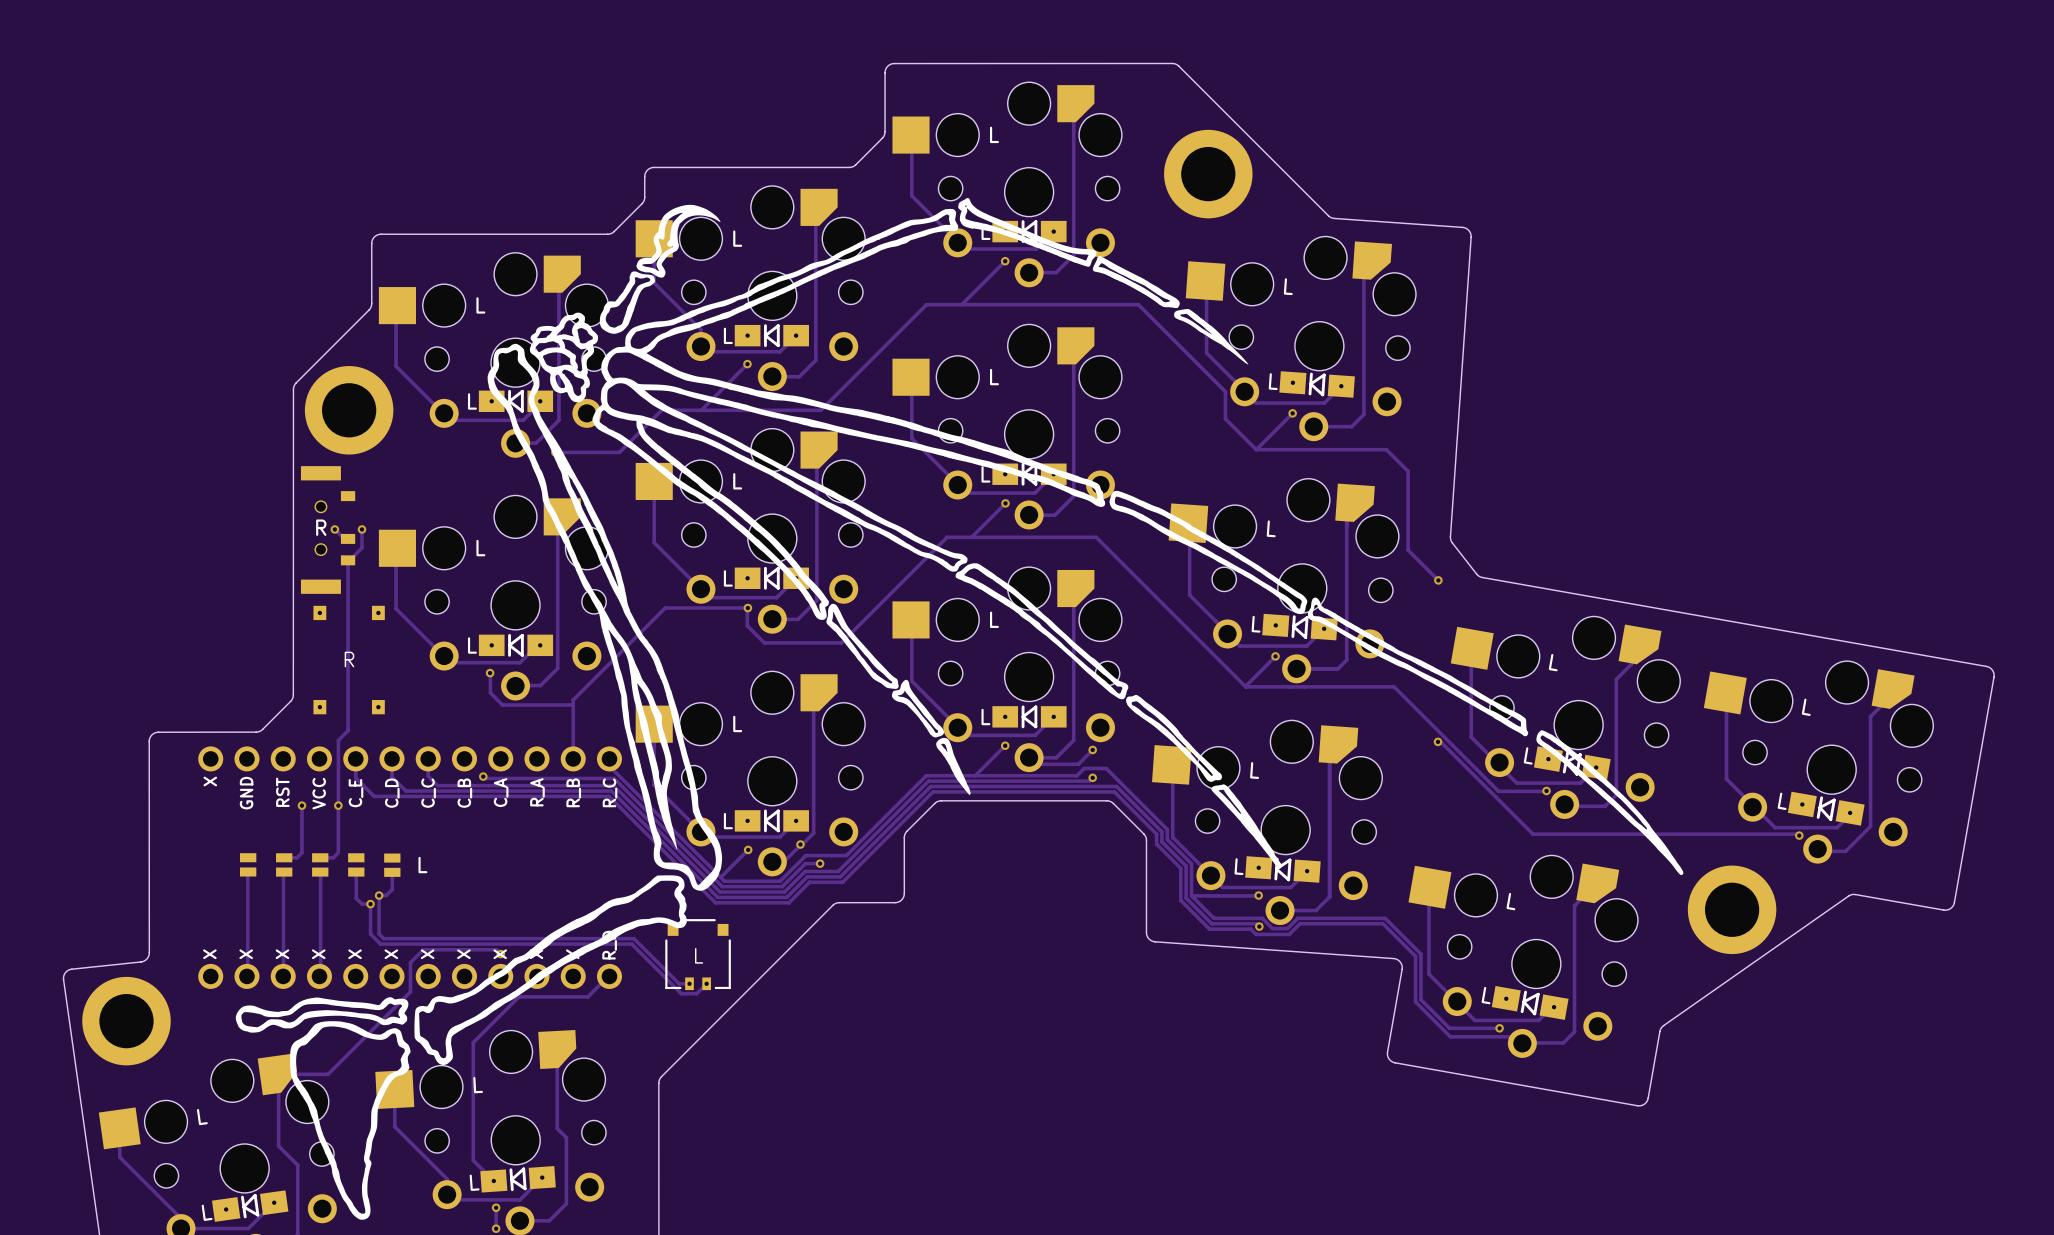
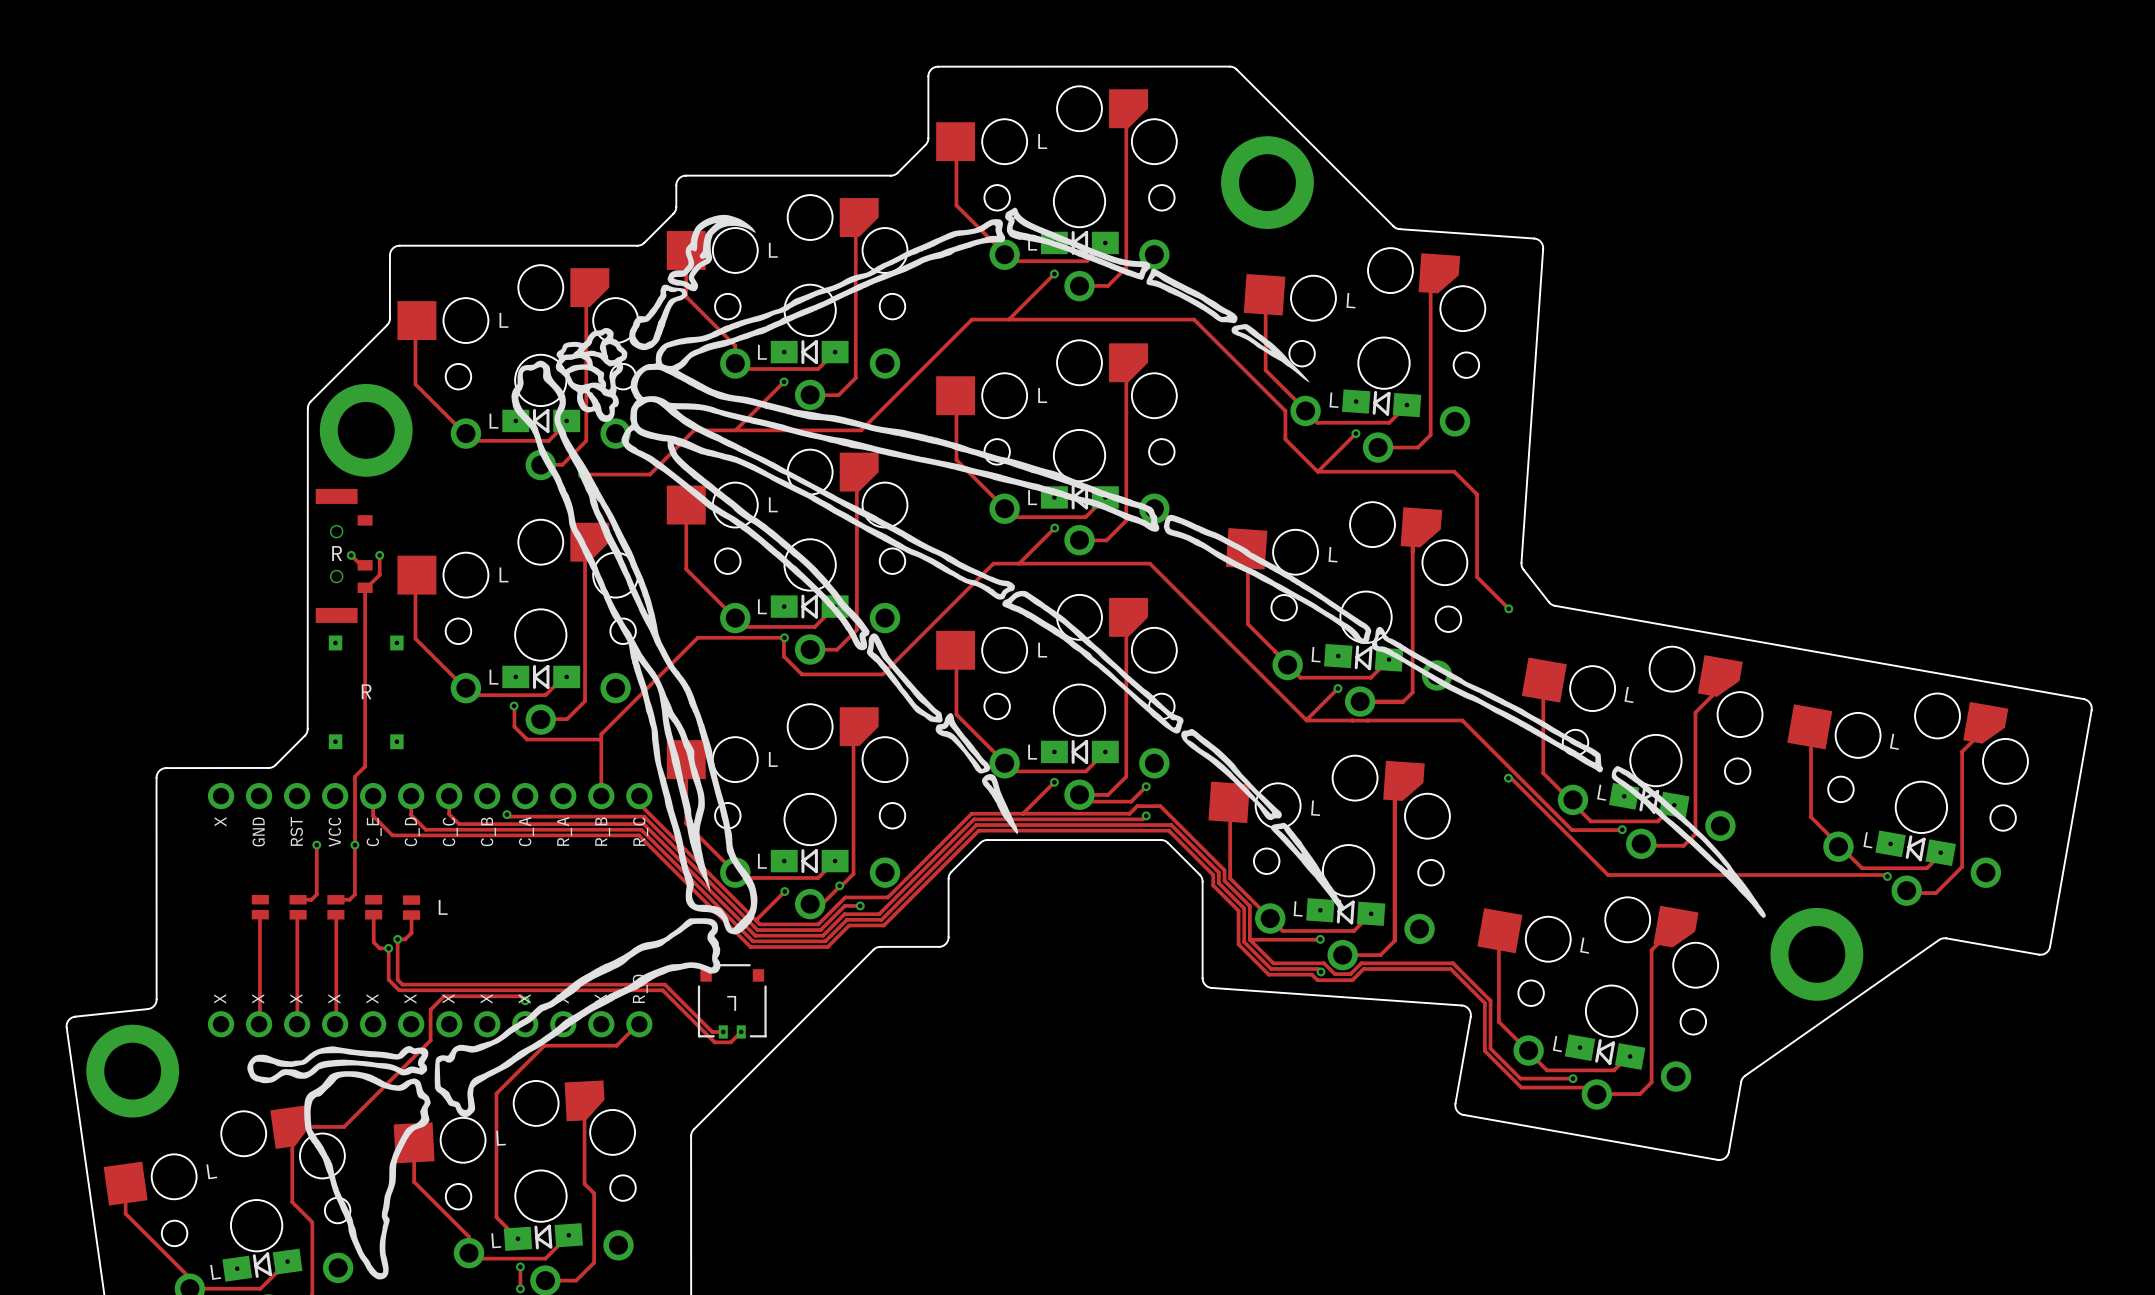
part text rotation: 0° (699, 955) -> 180° (731, 1003)

